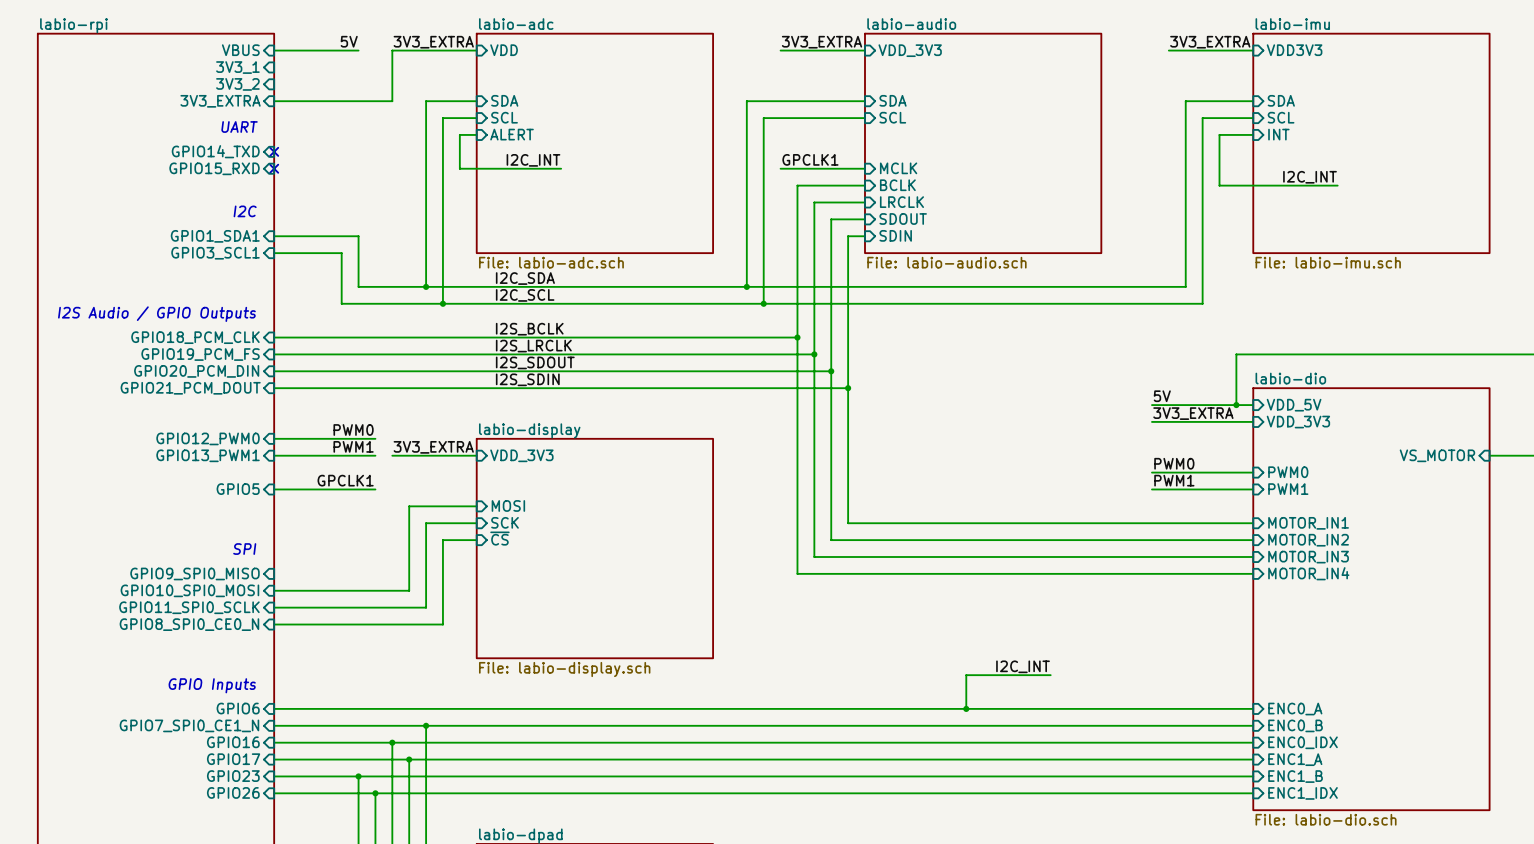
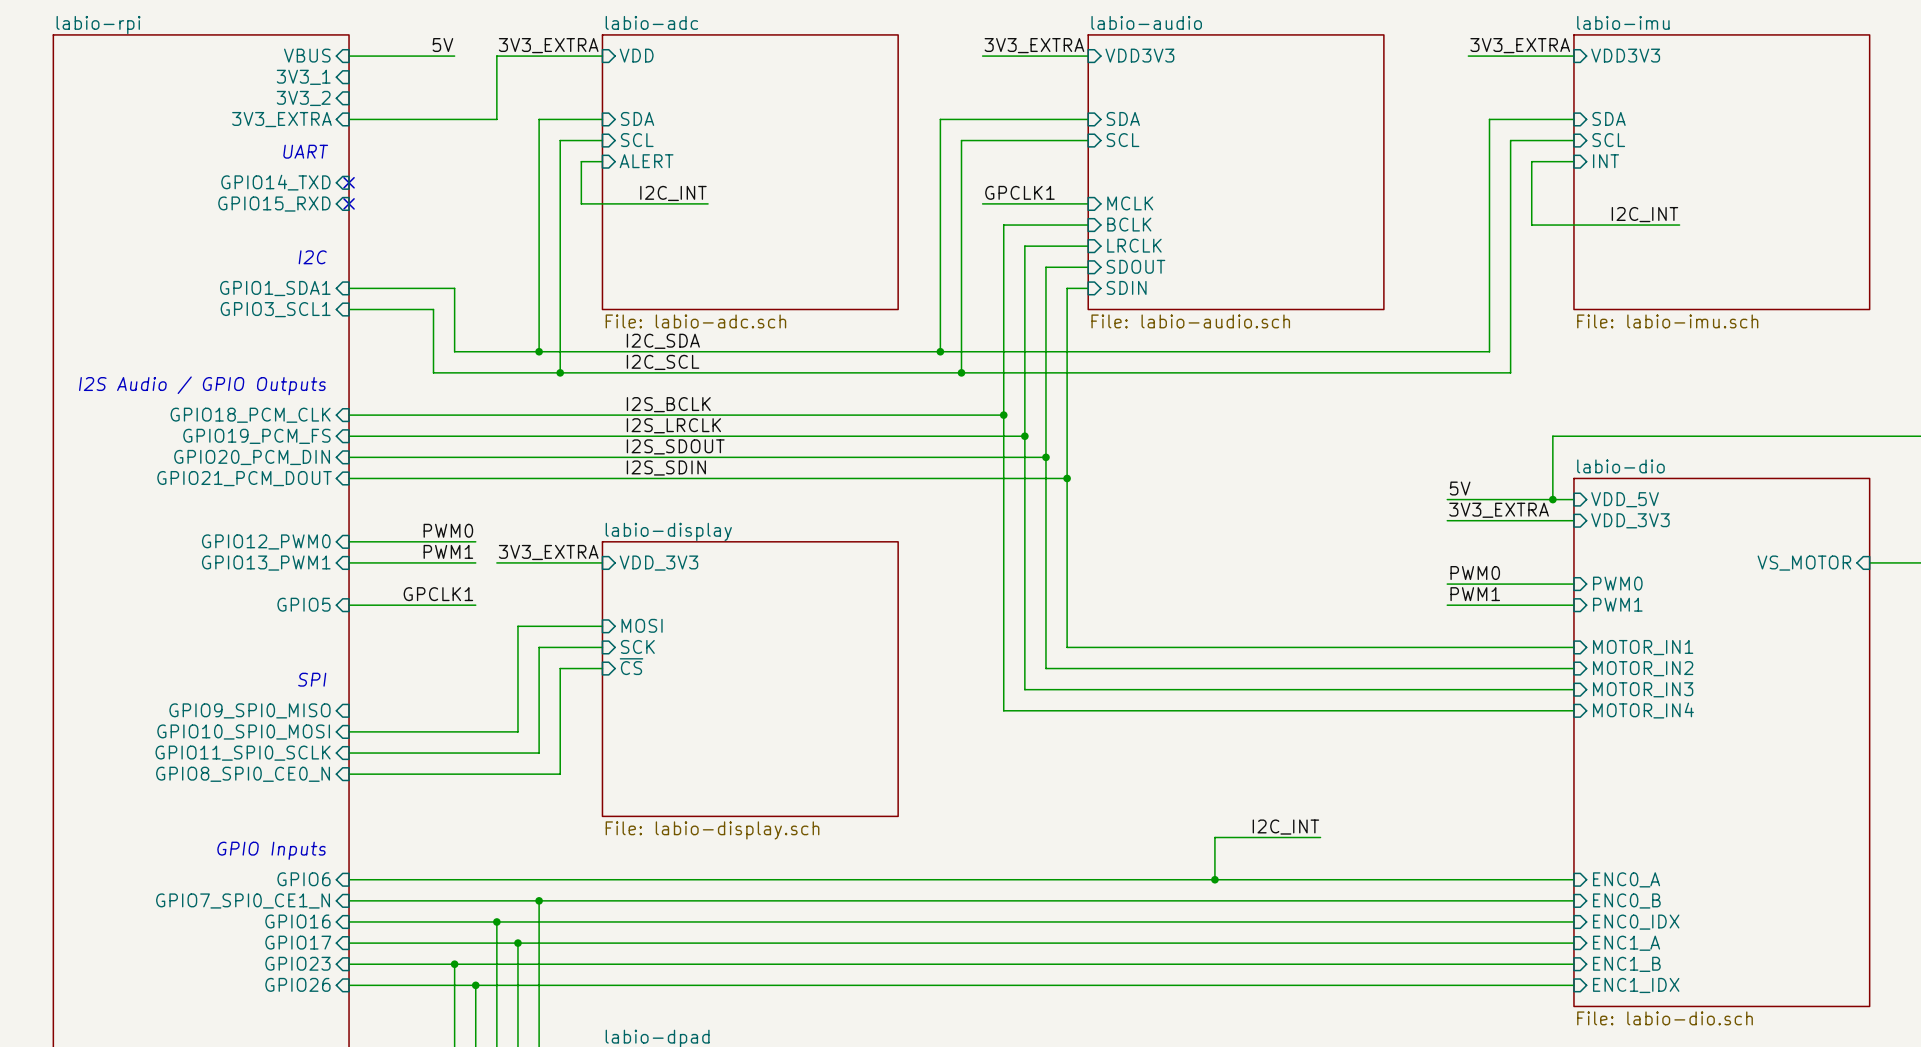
sheet pin: VDD_3V3 (910, 50) -> VDD3V3 (1139, 55)

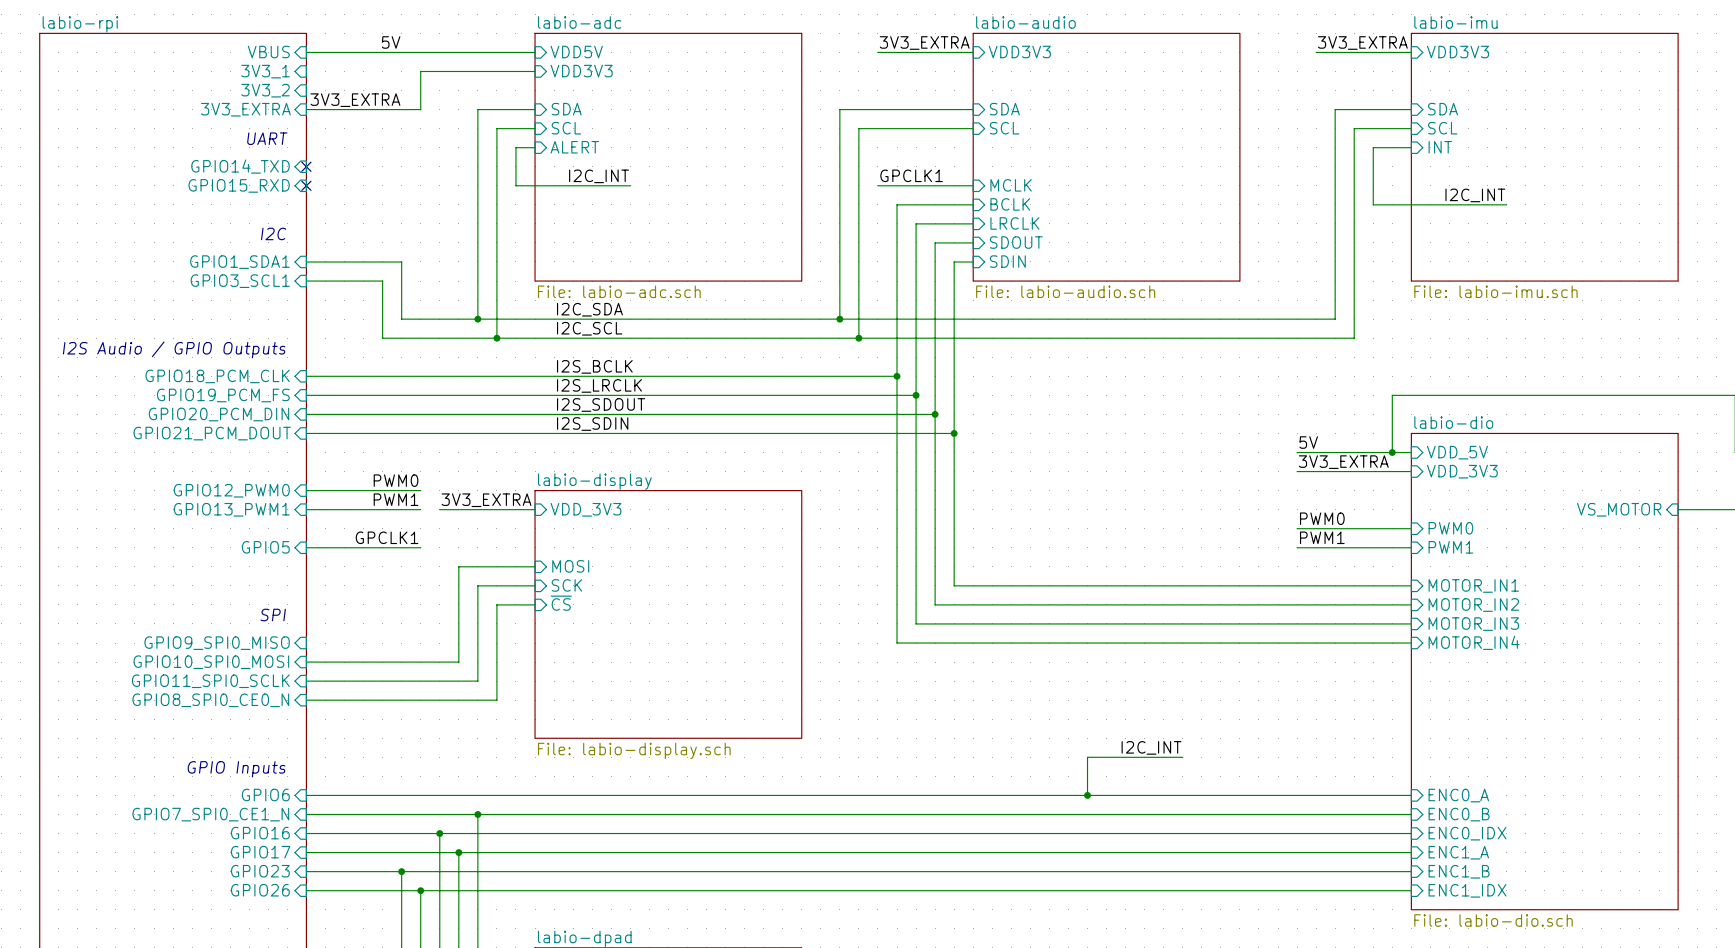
label position: 3V3_EXTRA (548, 45) -> 3V3_EXTRA (355, 100)
sheet pin: VDD (636, 55) -> VDD5V (576, 52)
wire: (496, 56) (496, 119) (475, 119) -> (439, 52) (401, 52)
sheet pin: none -> VDD3V3 (581, 71)
wire: none -> (535, 71) (420, 71) (420, 109)

